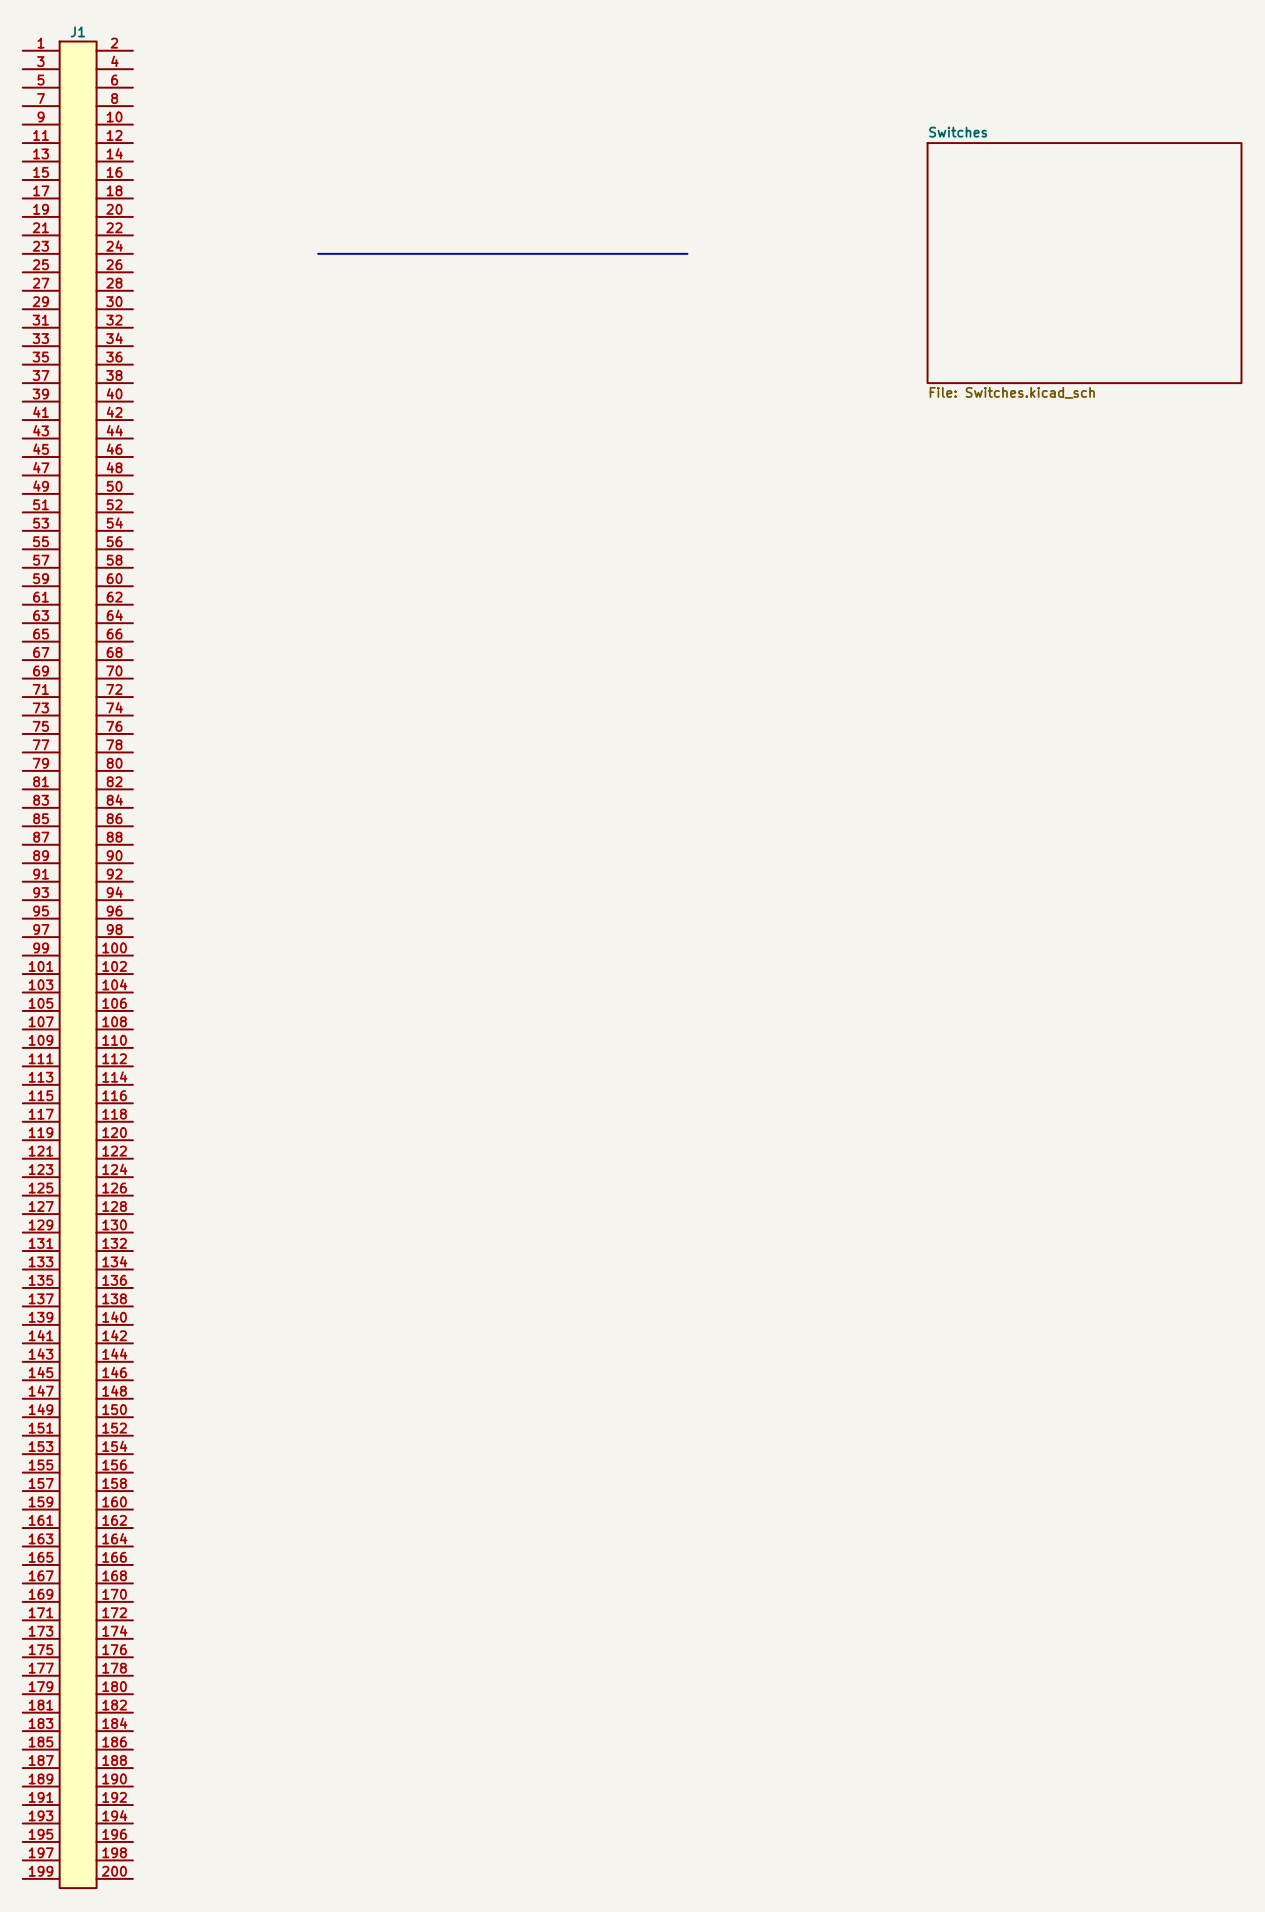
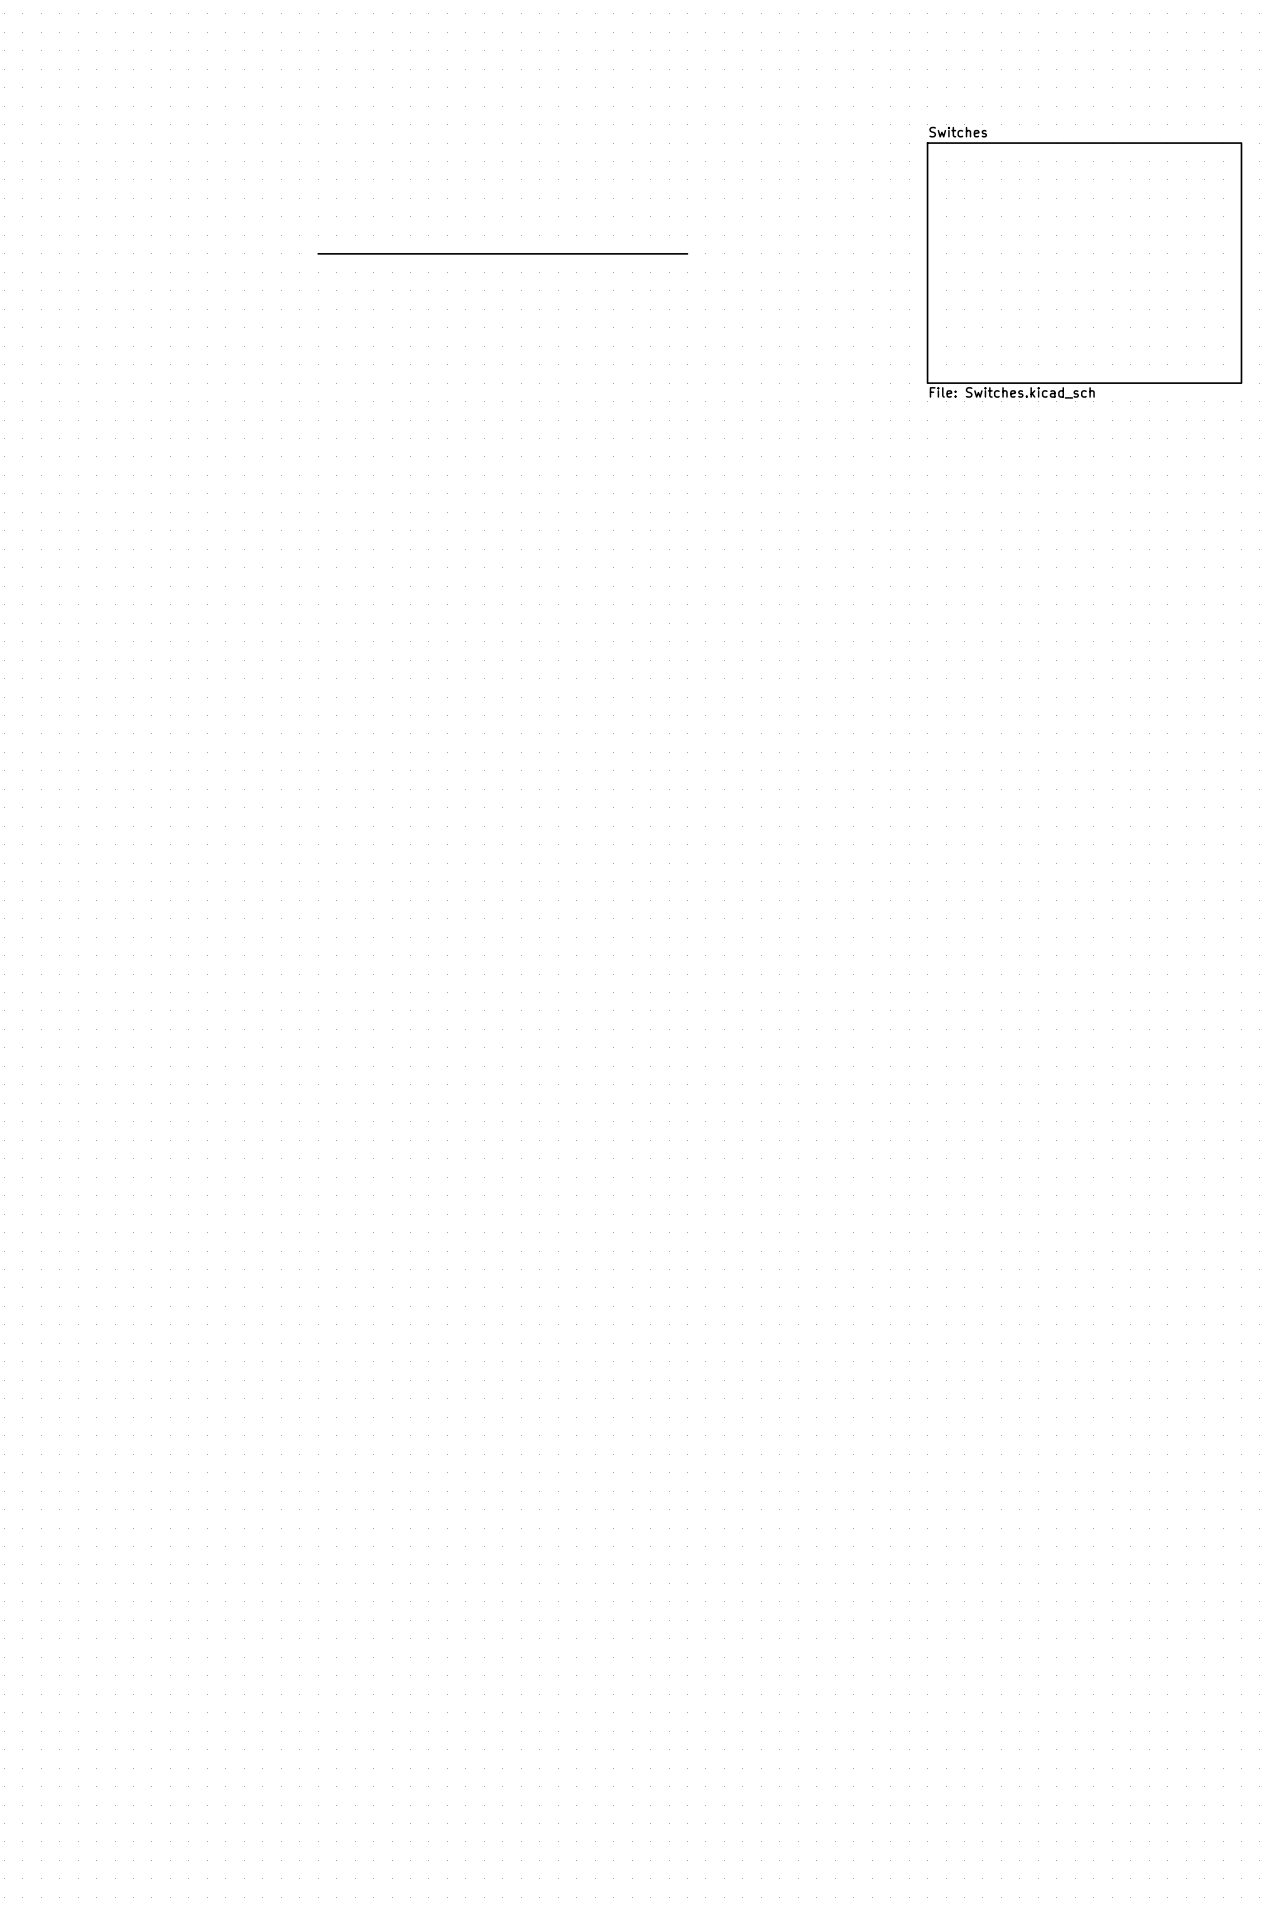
J1: (77, 964) -> none

